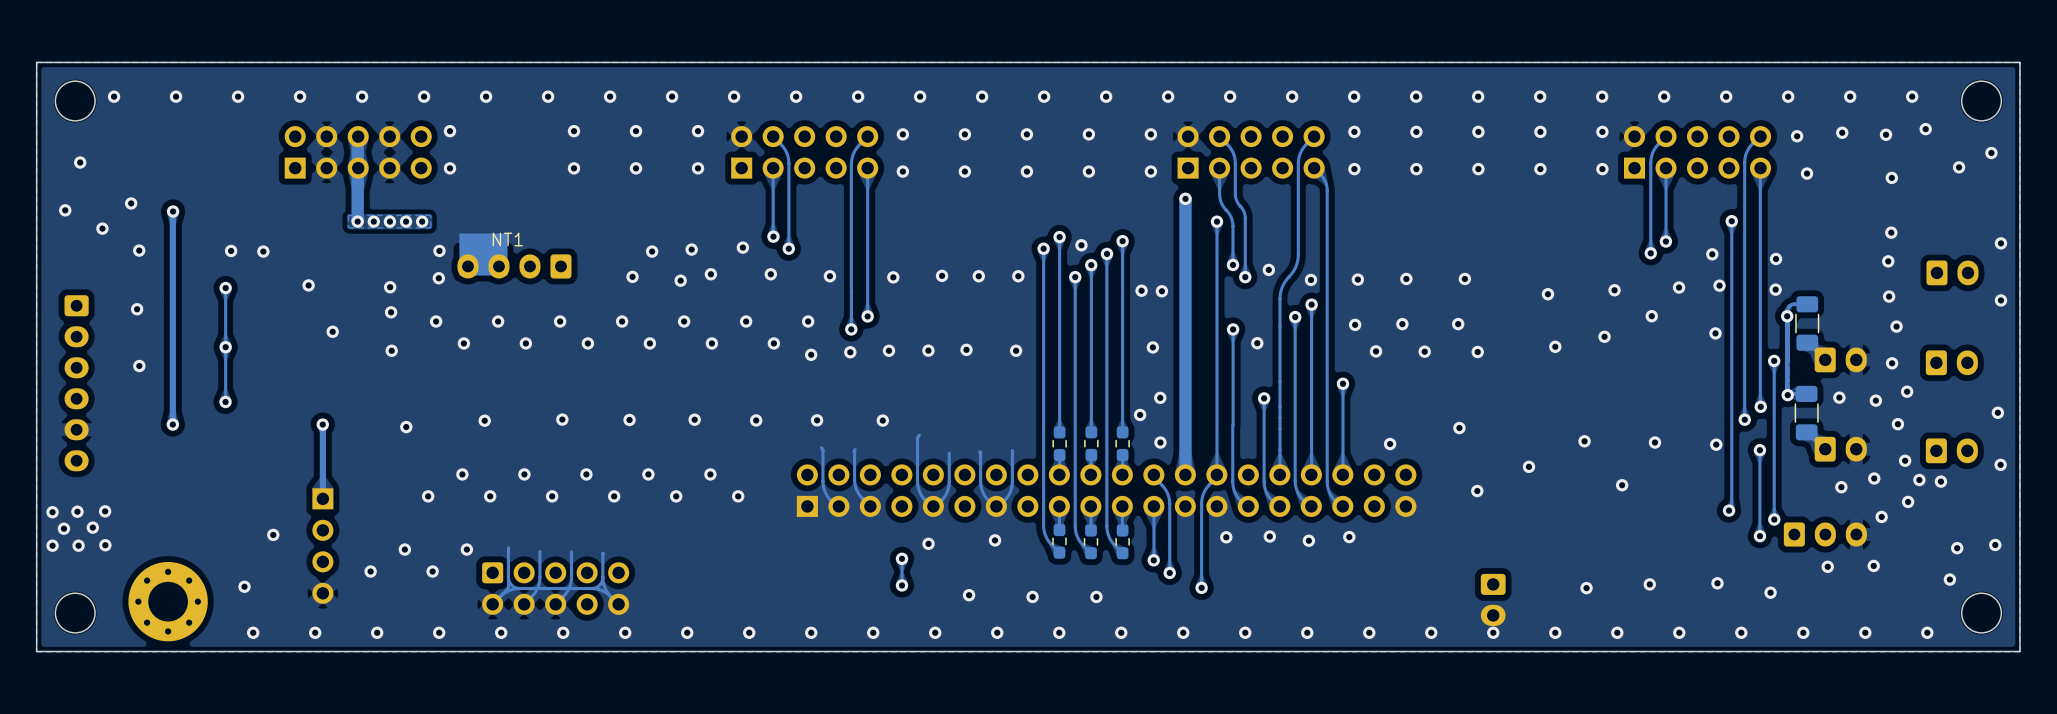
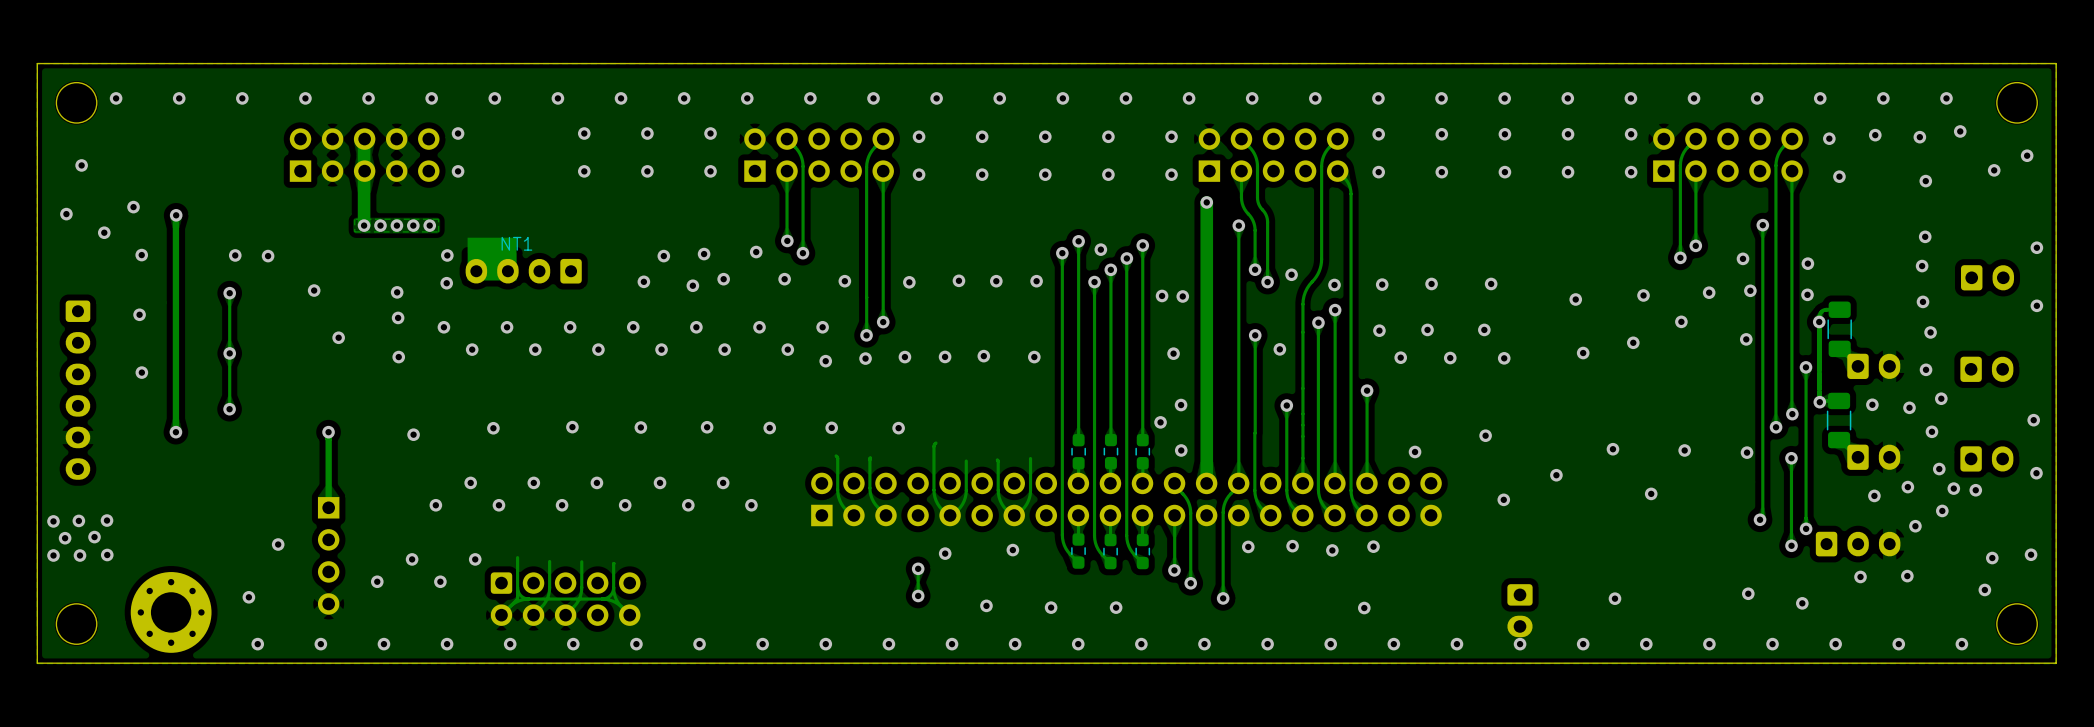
via: (1649, 584) -> none
via: none -> (1364, 608)

